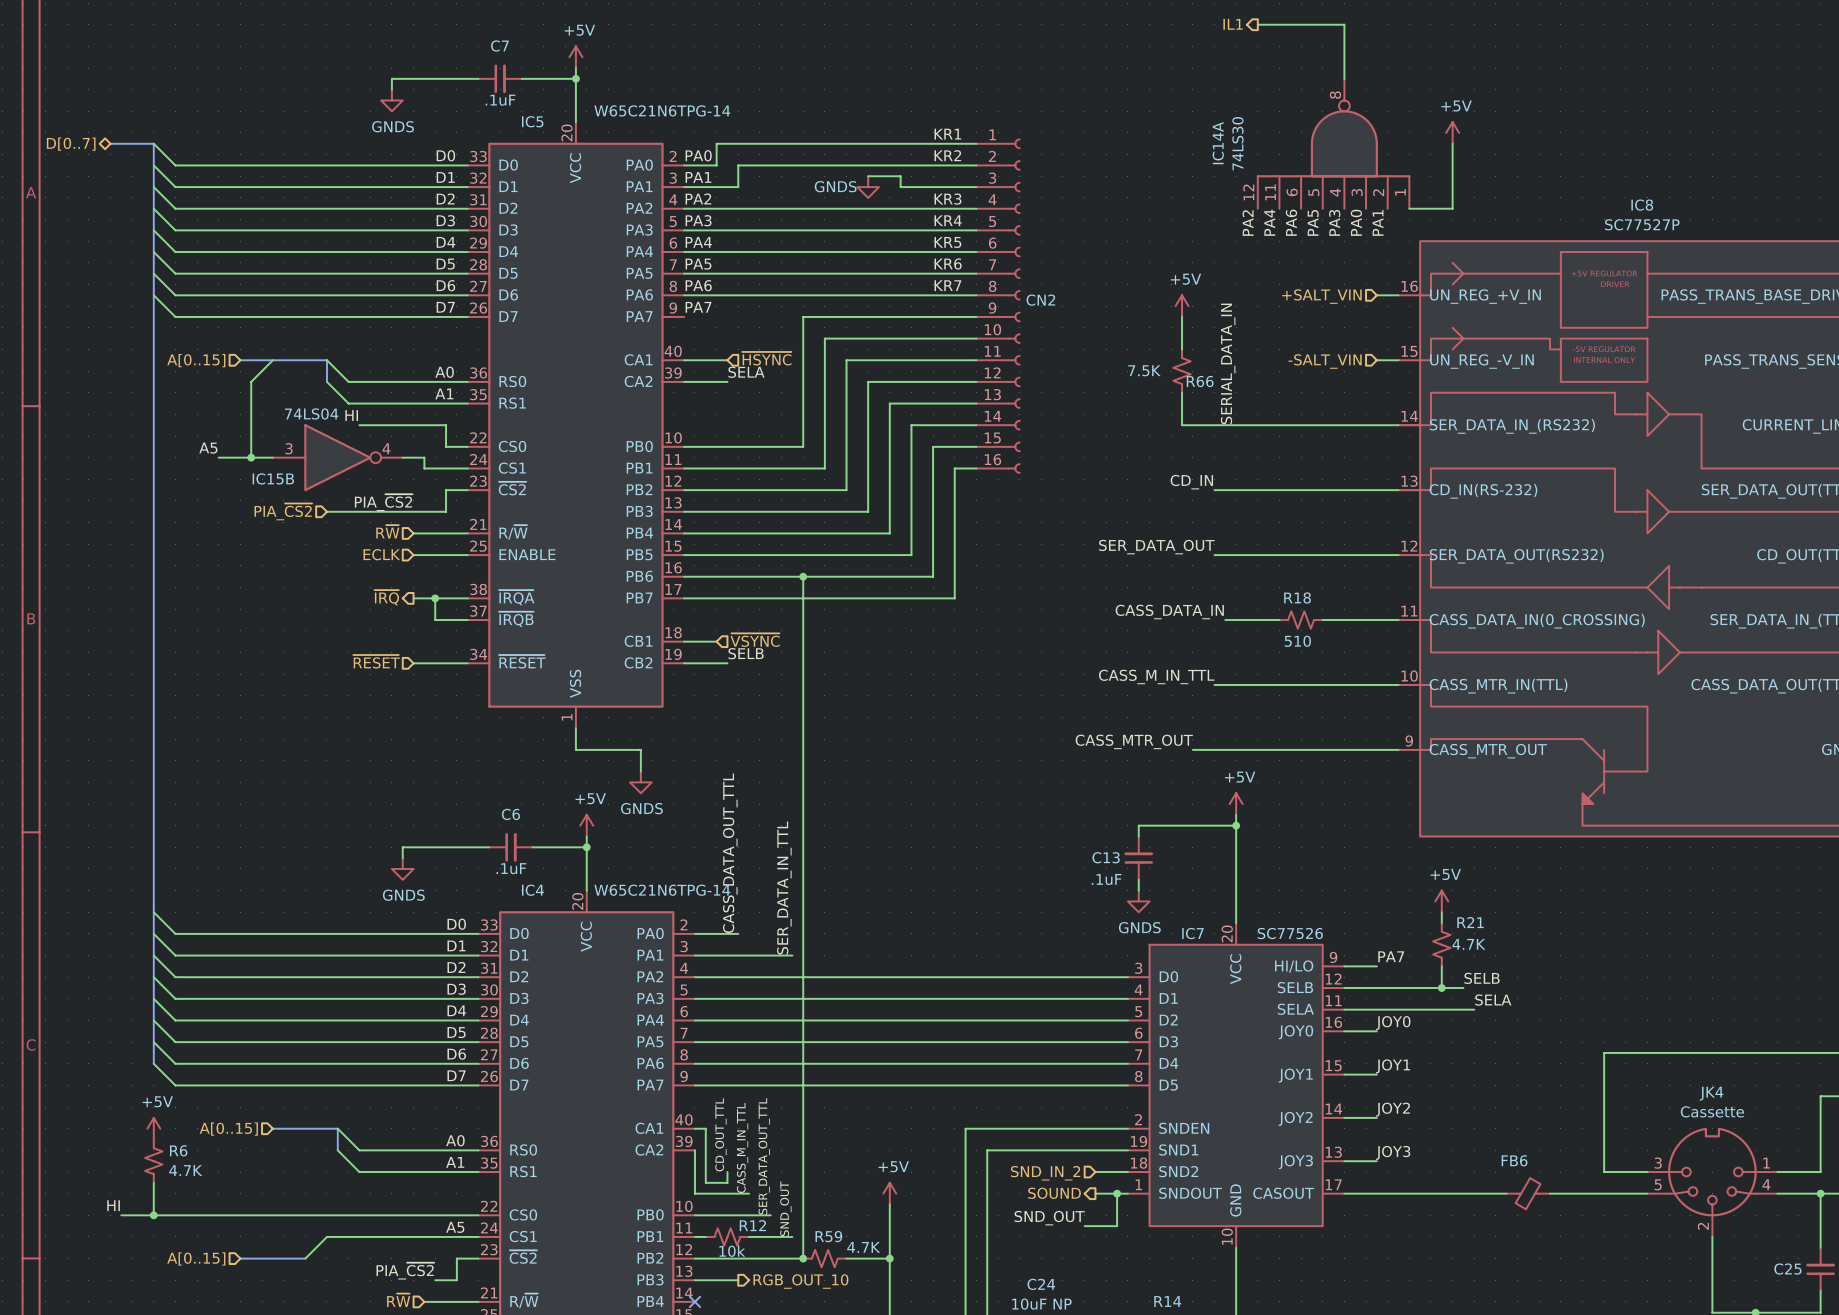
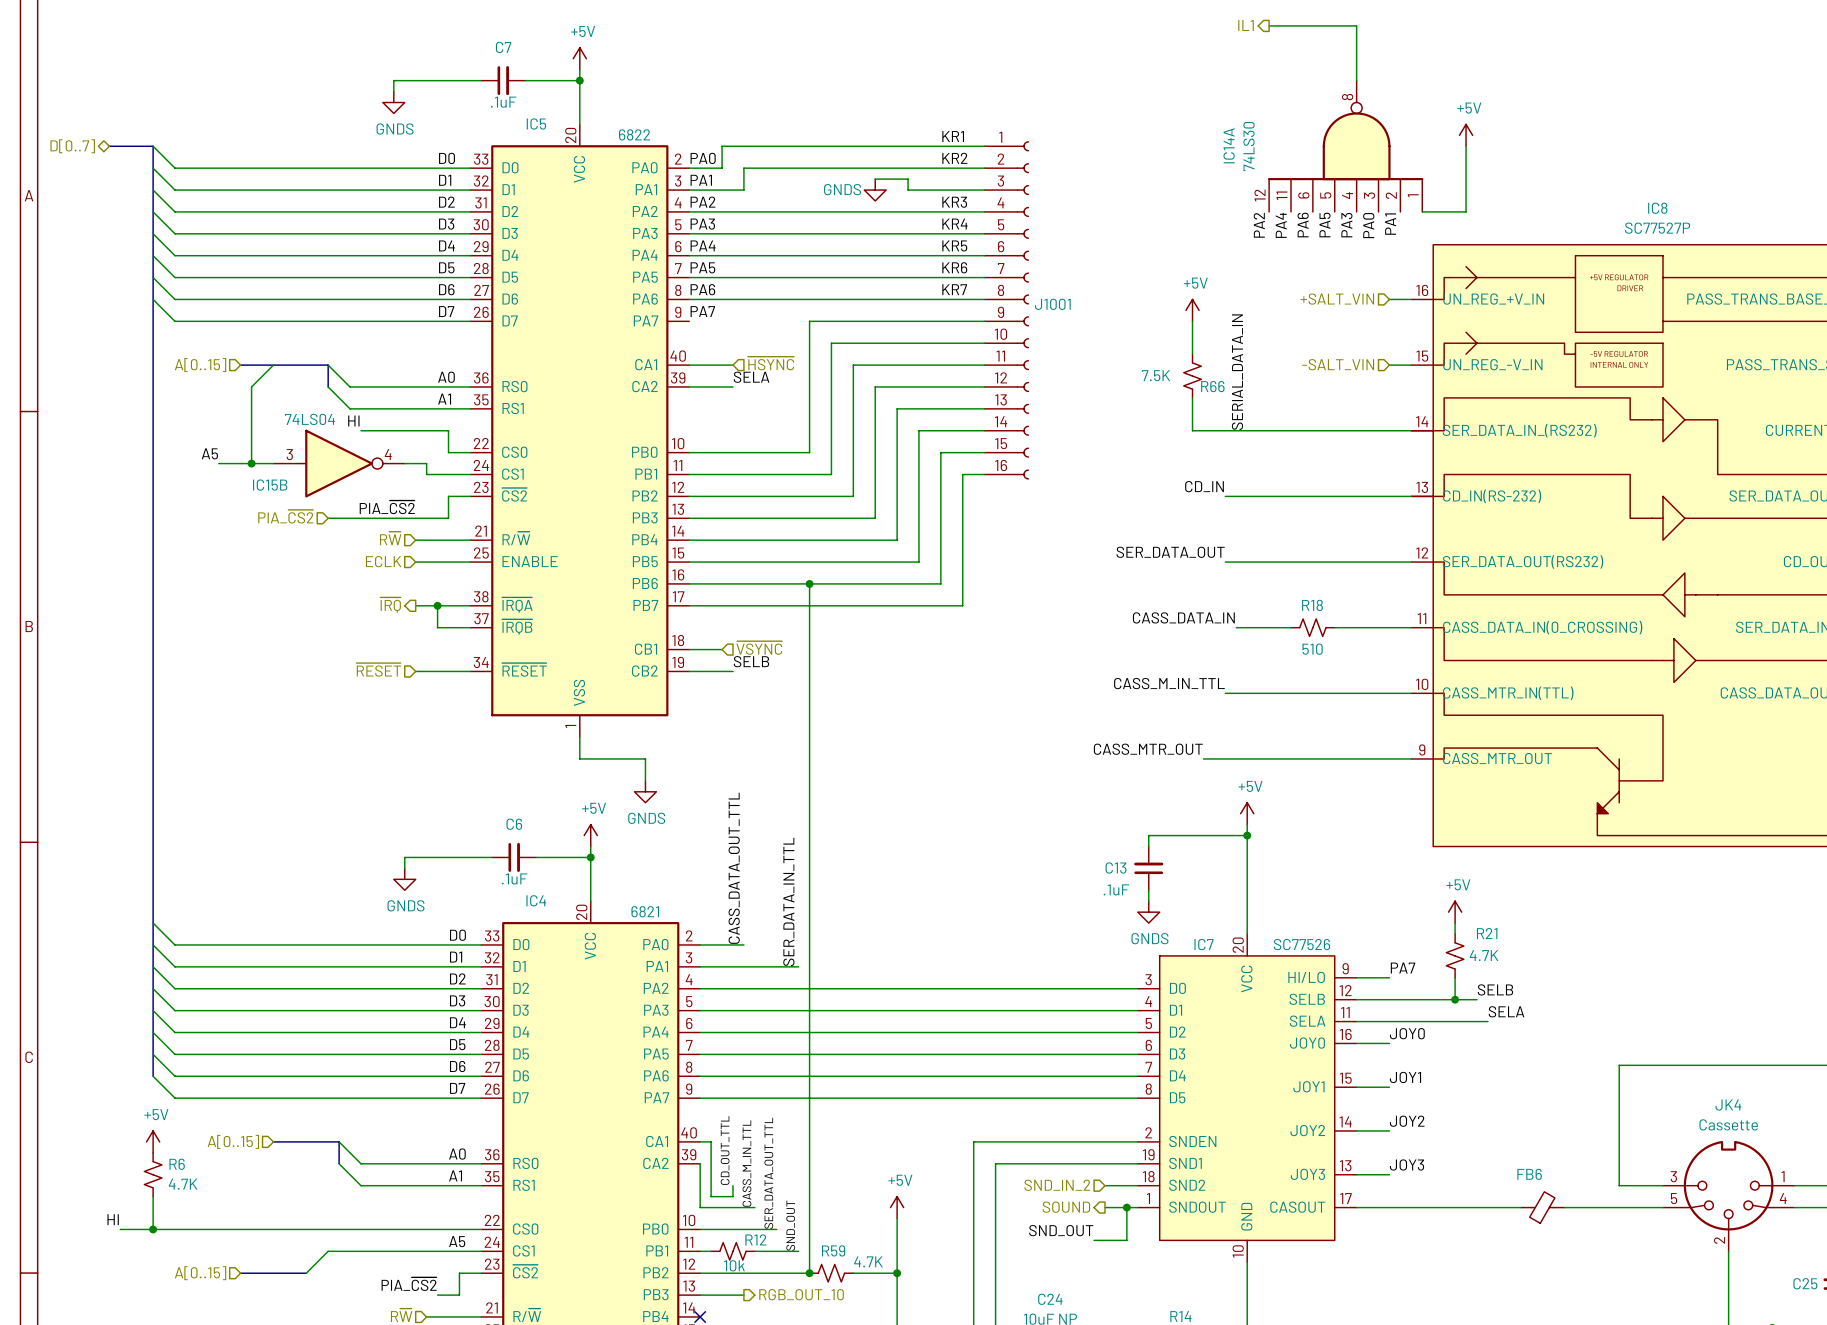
IC5 value: W65C21N6TPG-14 (662, 110) -> 6822 (634, 134)
CN2 name: CN2 (1040, 300) -> J1001 (1052, 304)
IC4 value: W65C21N6TPG-14 (662, 890) -> 6821 (645, 911)

